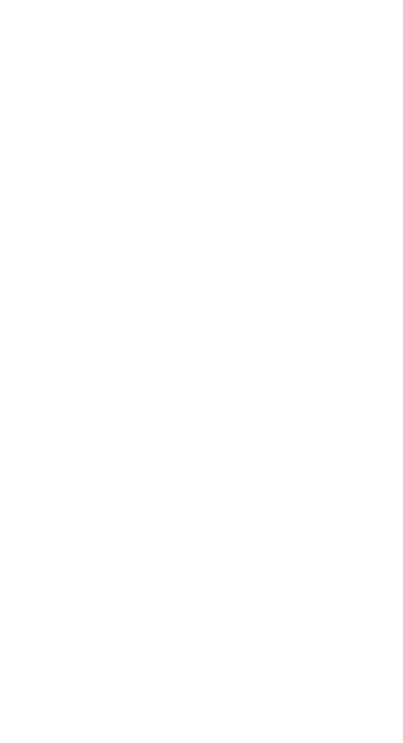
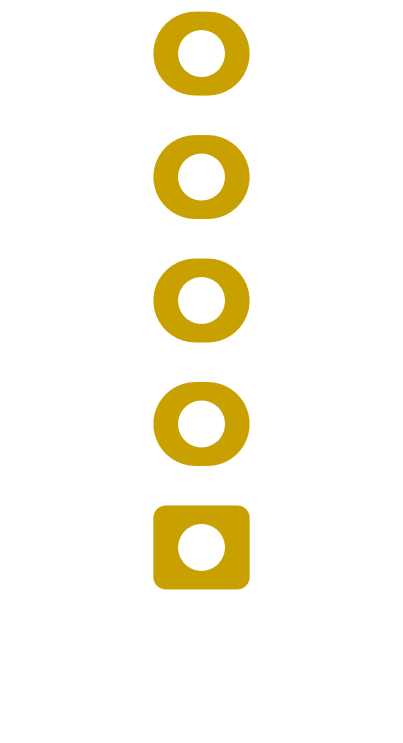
part: none -> (201, 300)

